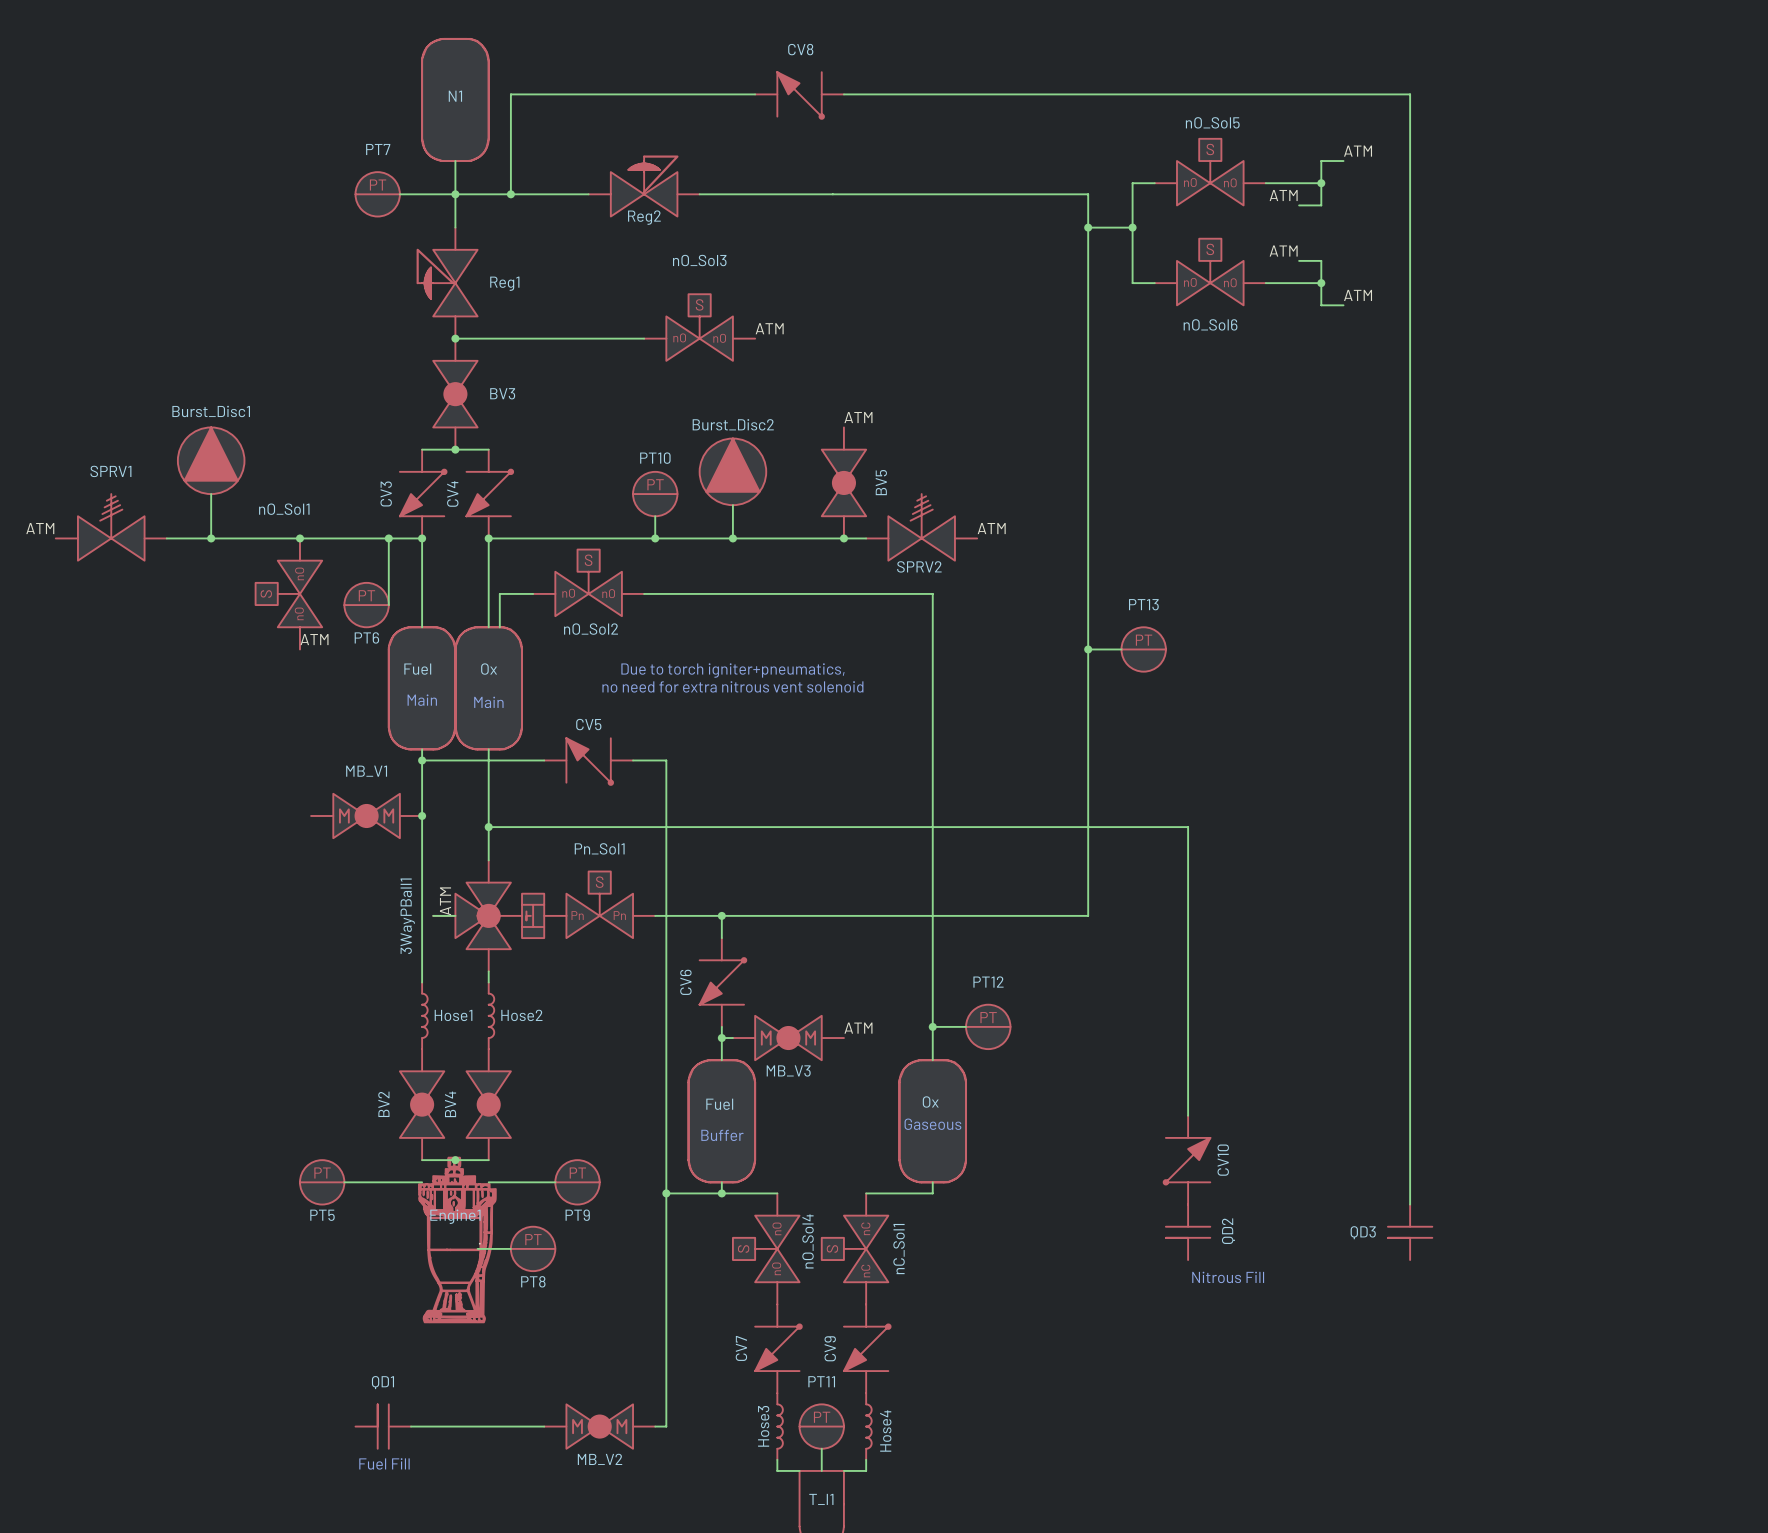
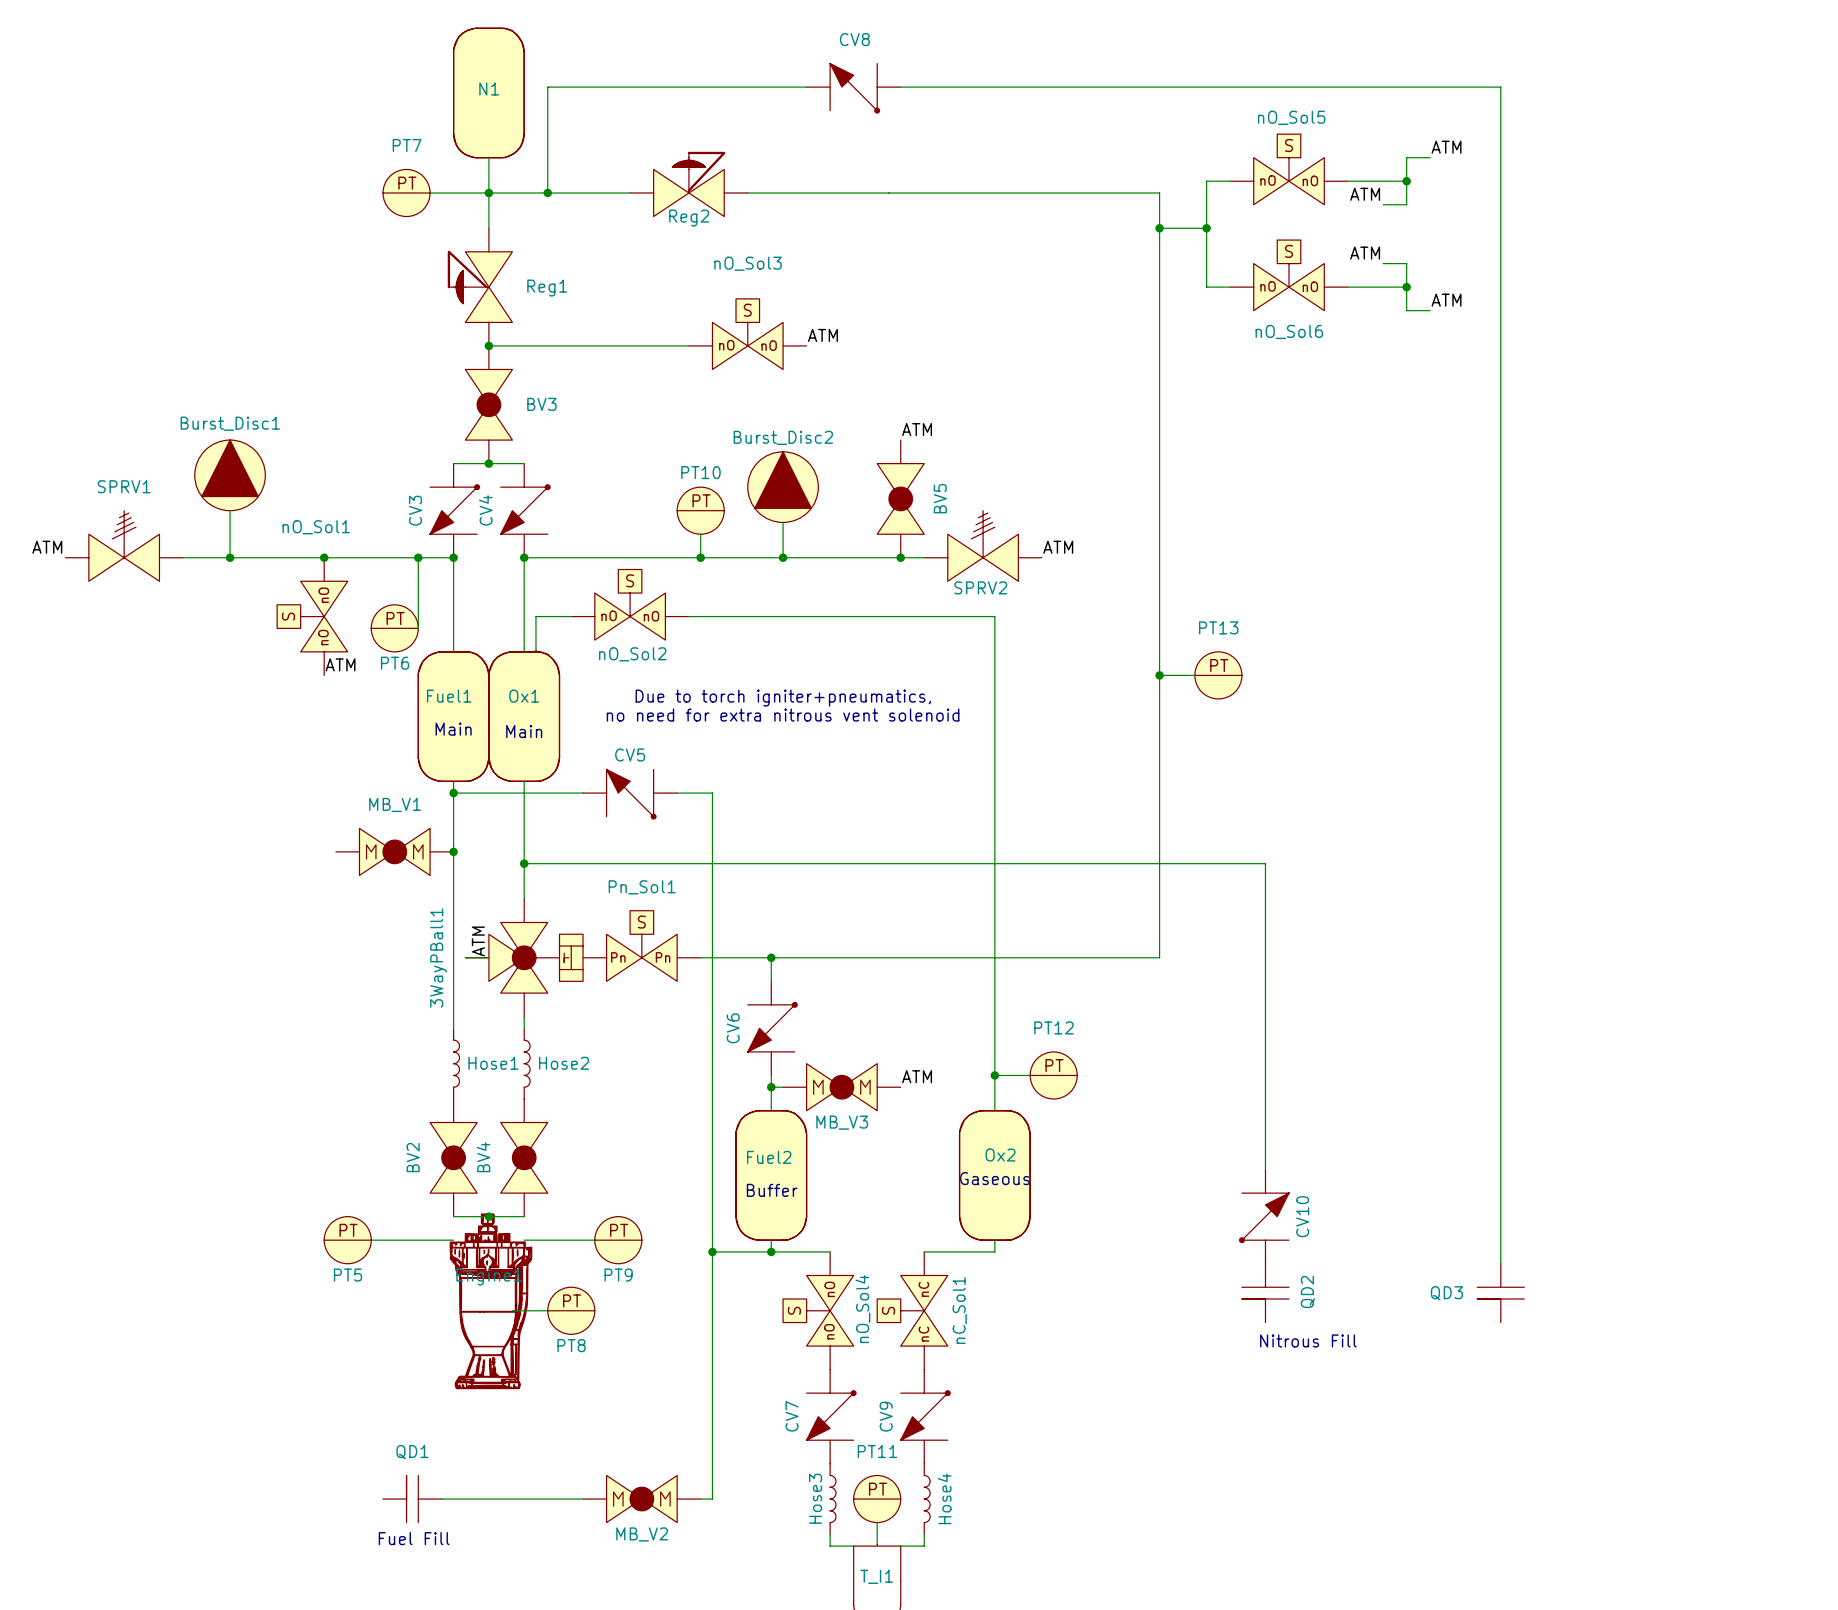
Fuel name: Fuel (417, 669) -> Fuel1 (449, 696)
Ox name: Ox (489, 669) -> Ox1 (524, 696)
Ox name: Ox (930, 1101) -> Ox2 (1000, 1155)
Fuel name: Fuel (719, 1104) -> Fuel2 (769, 1157)

